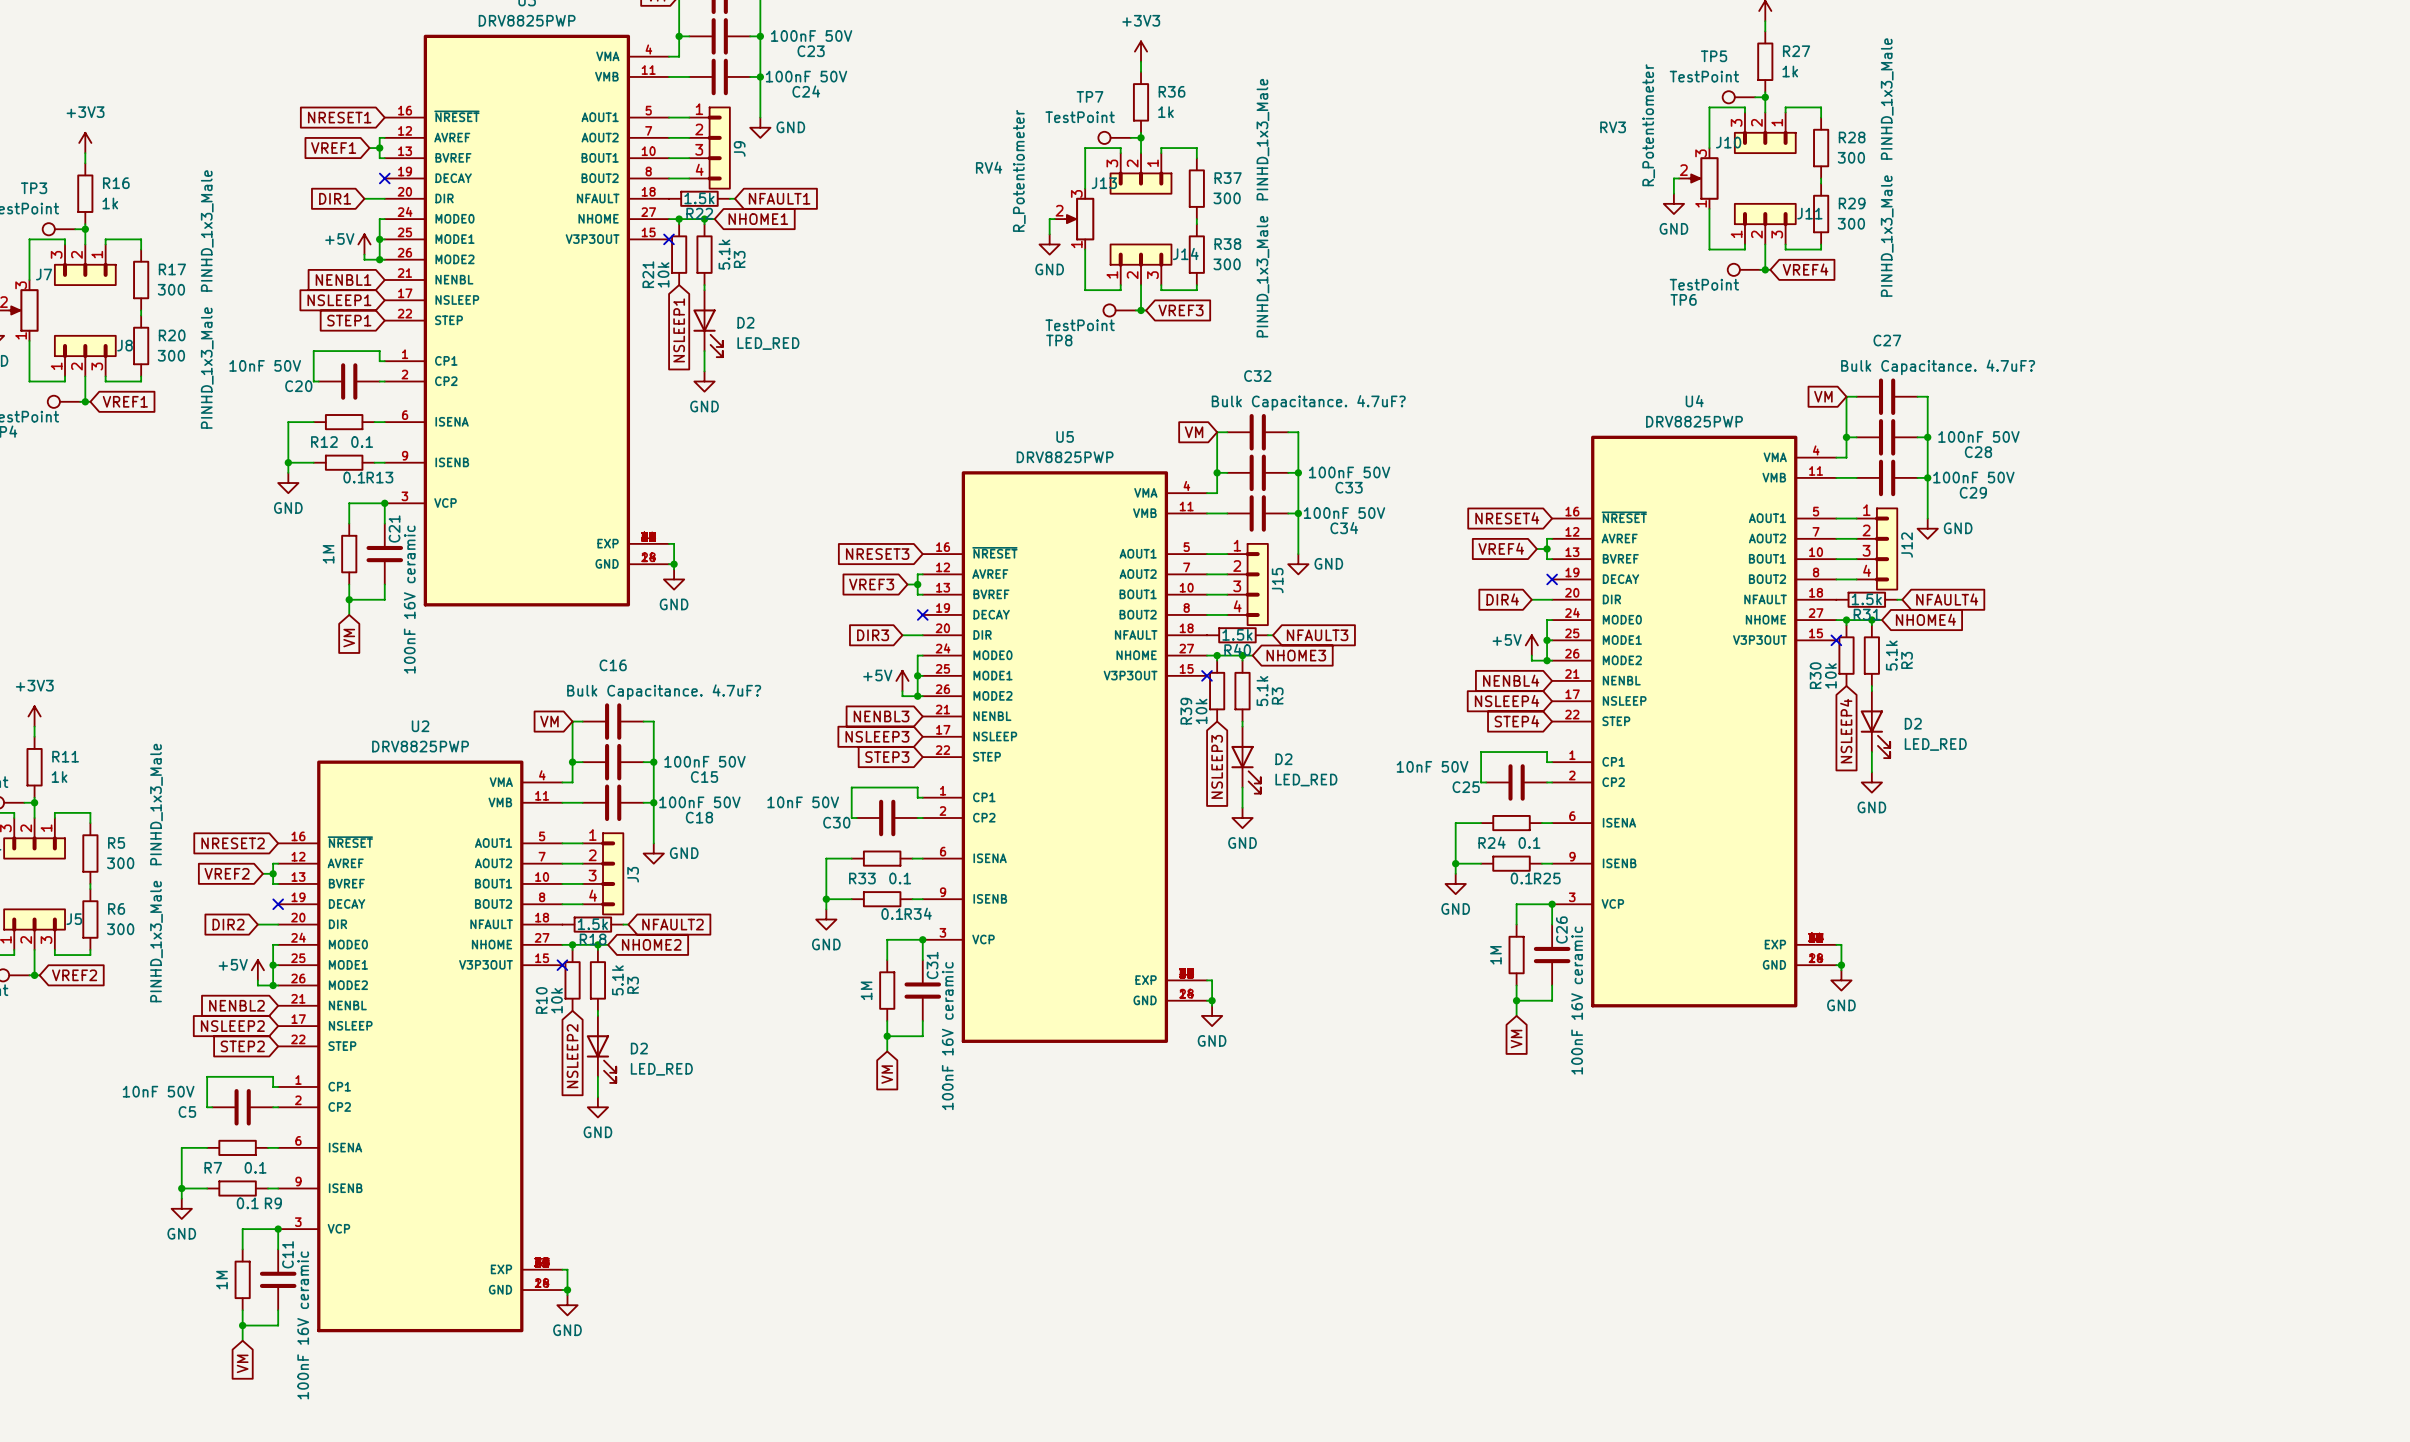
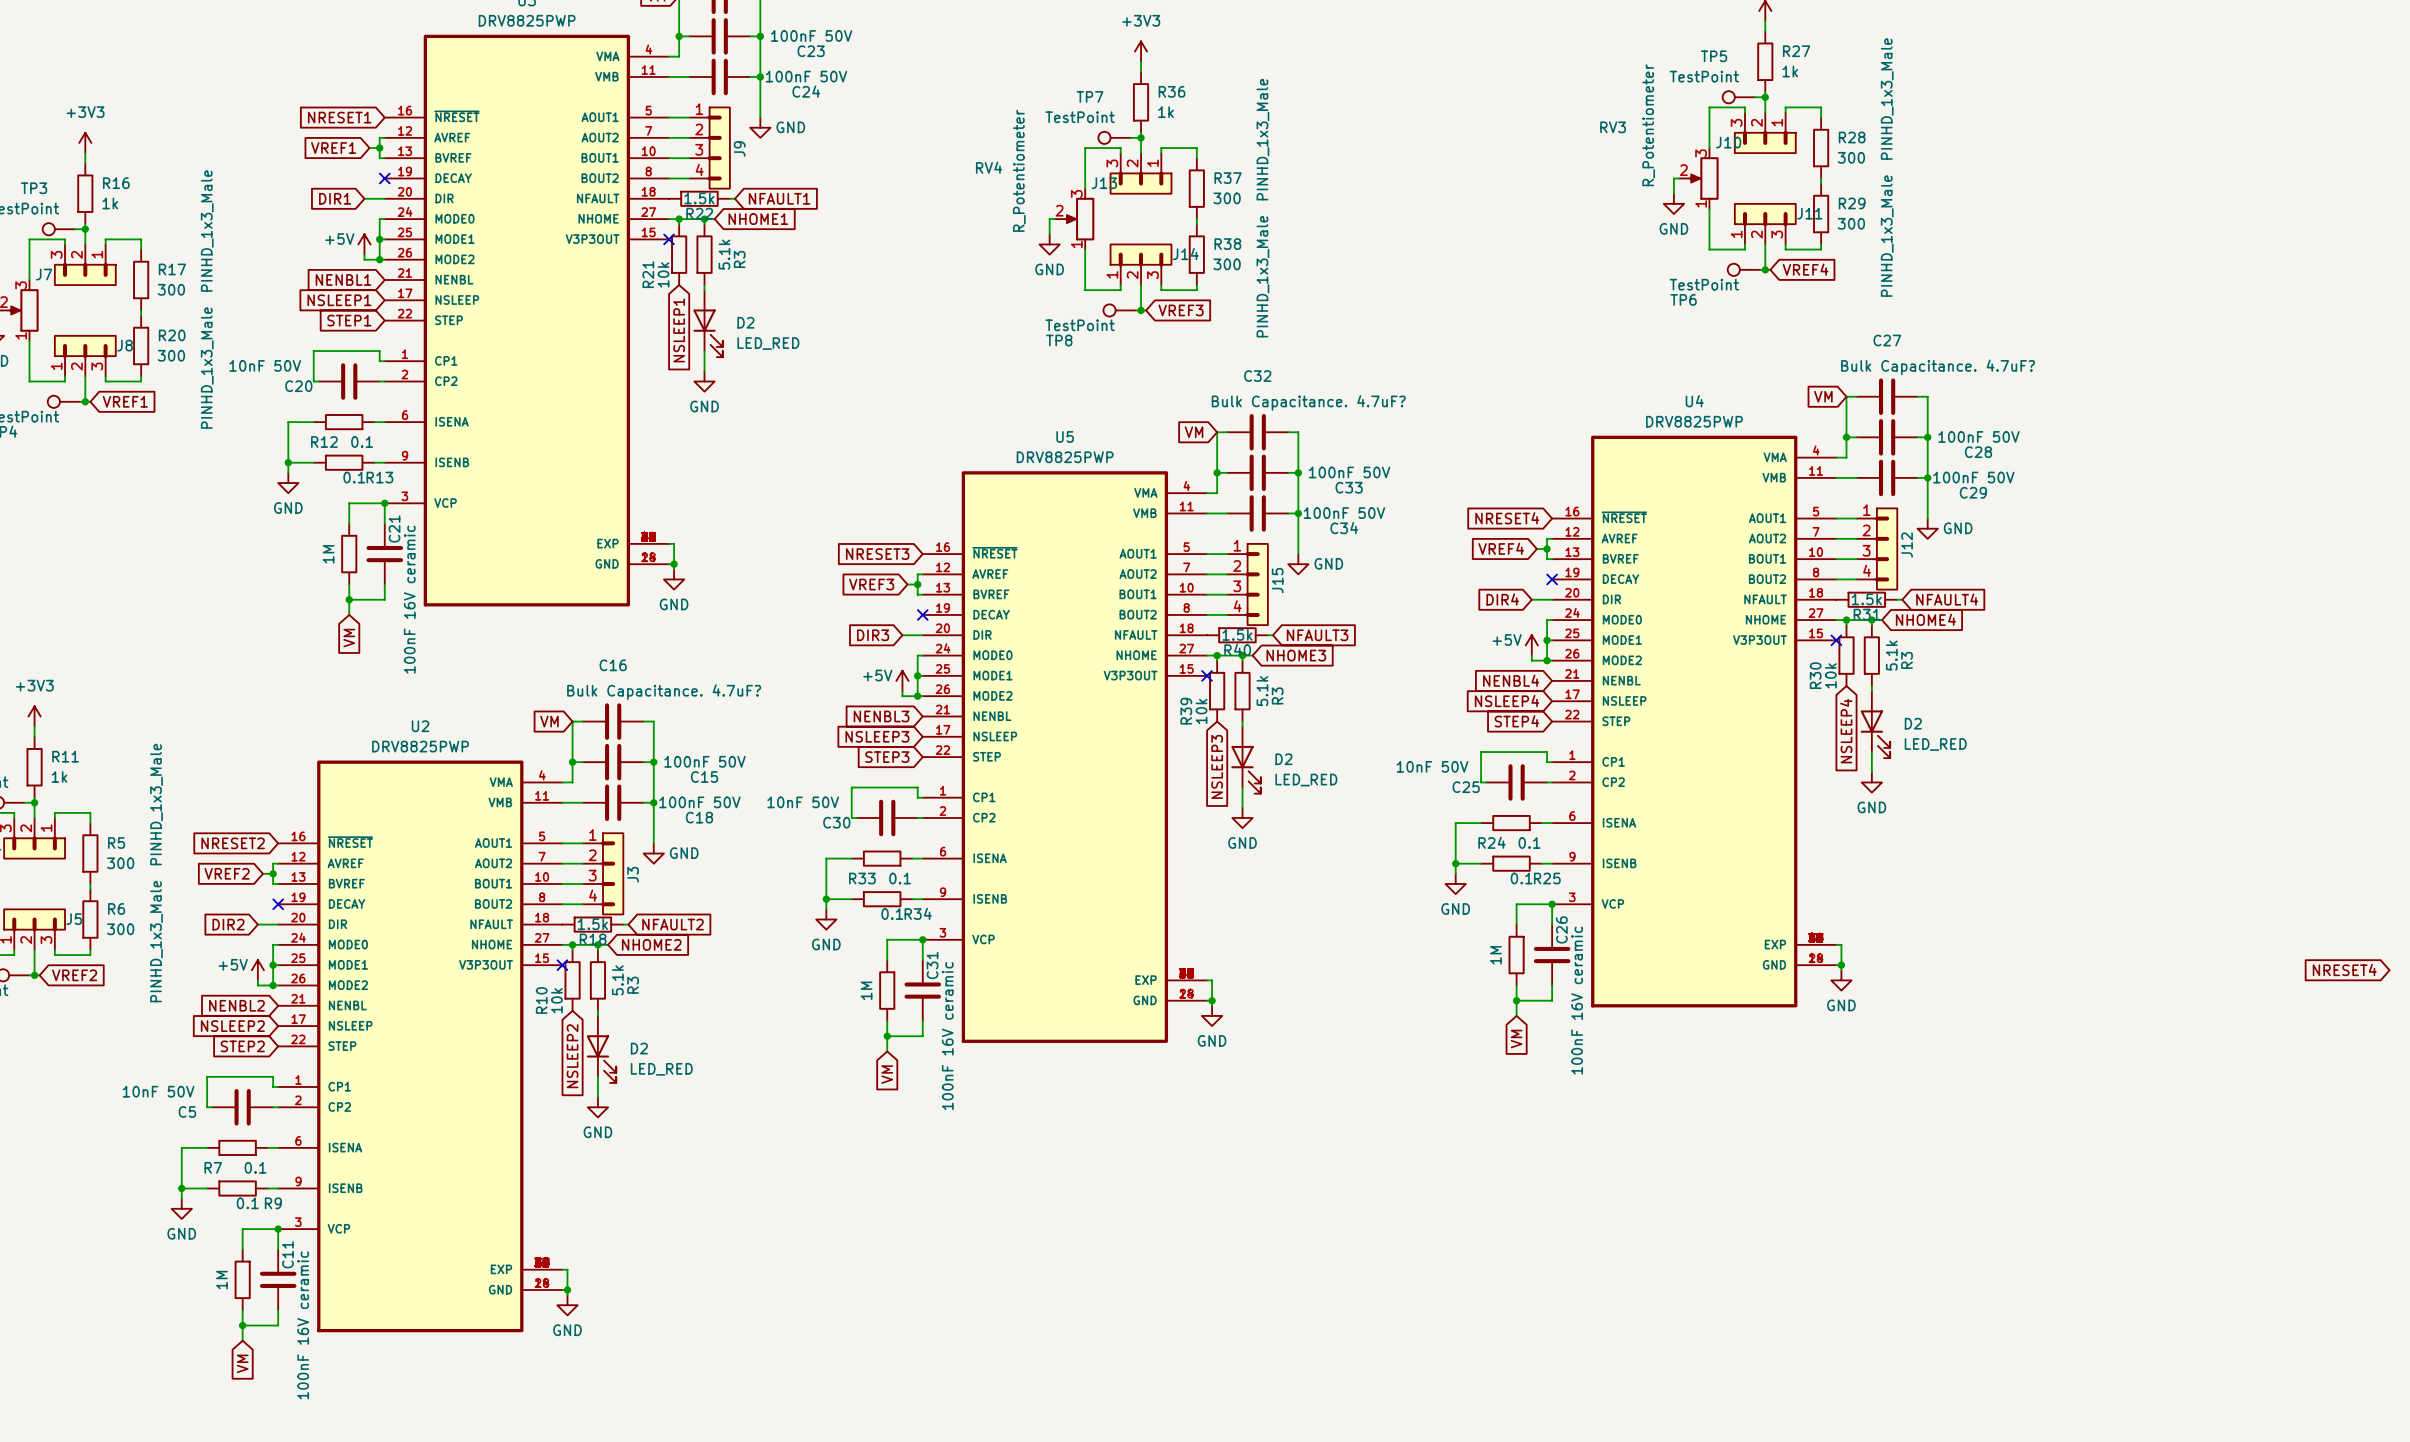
global label: none -> NRESET4 (2344, 970)

